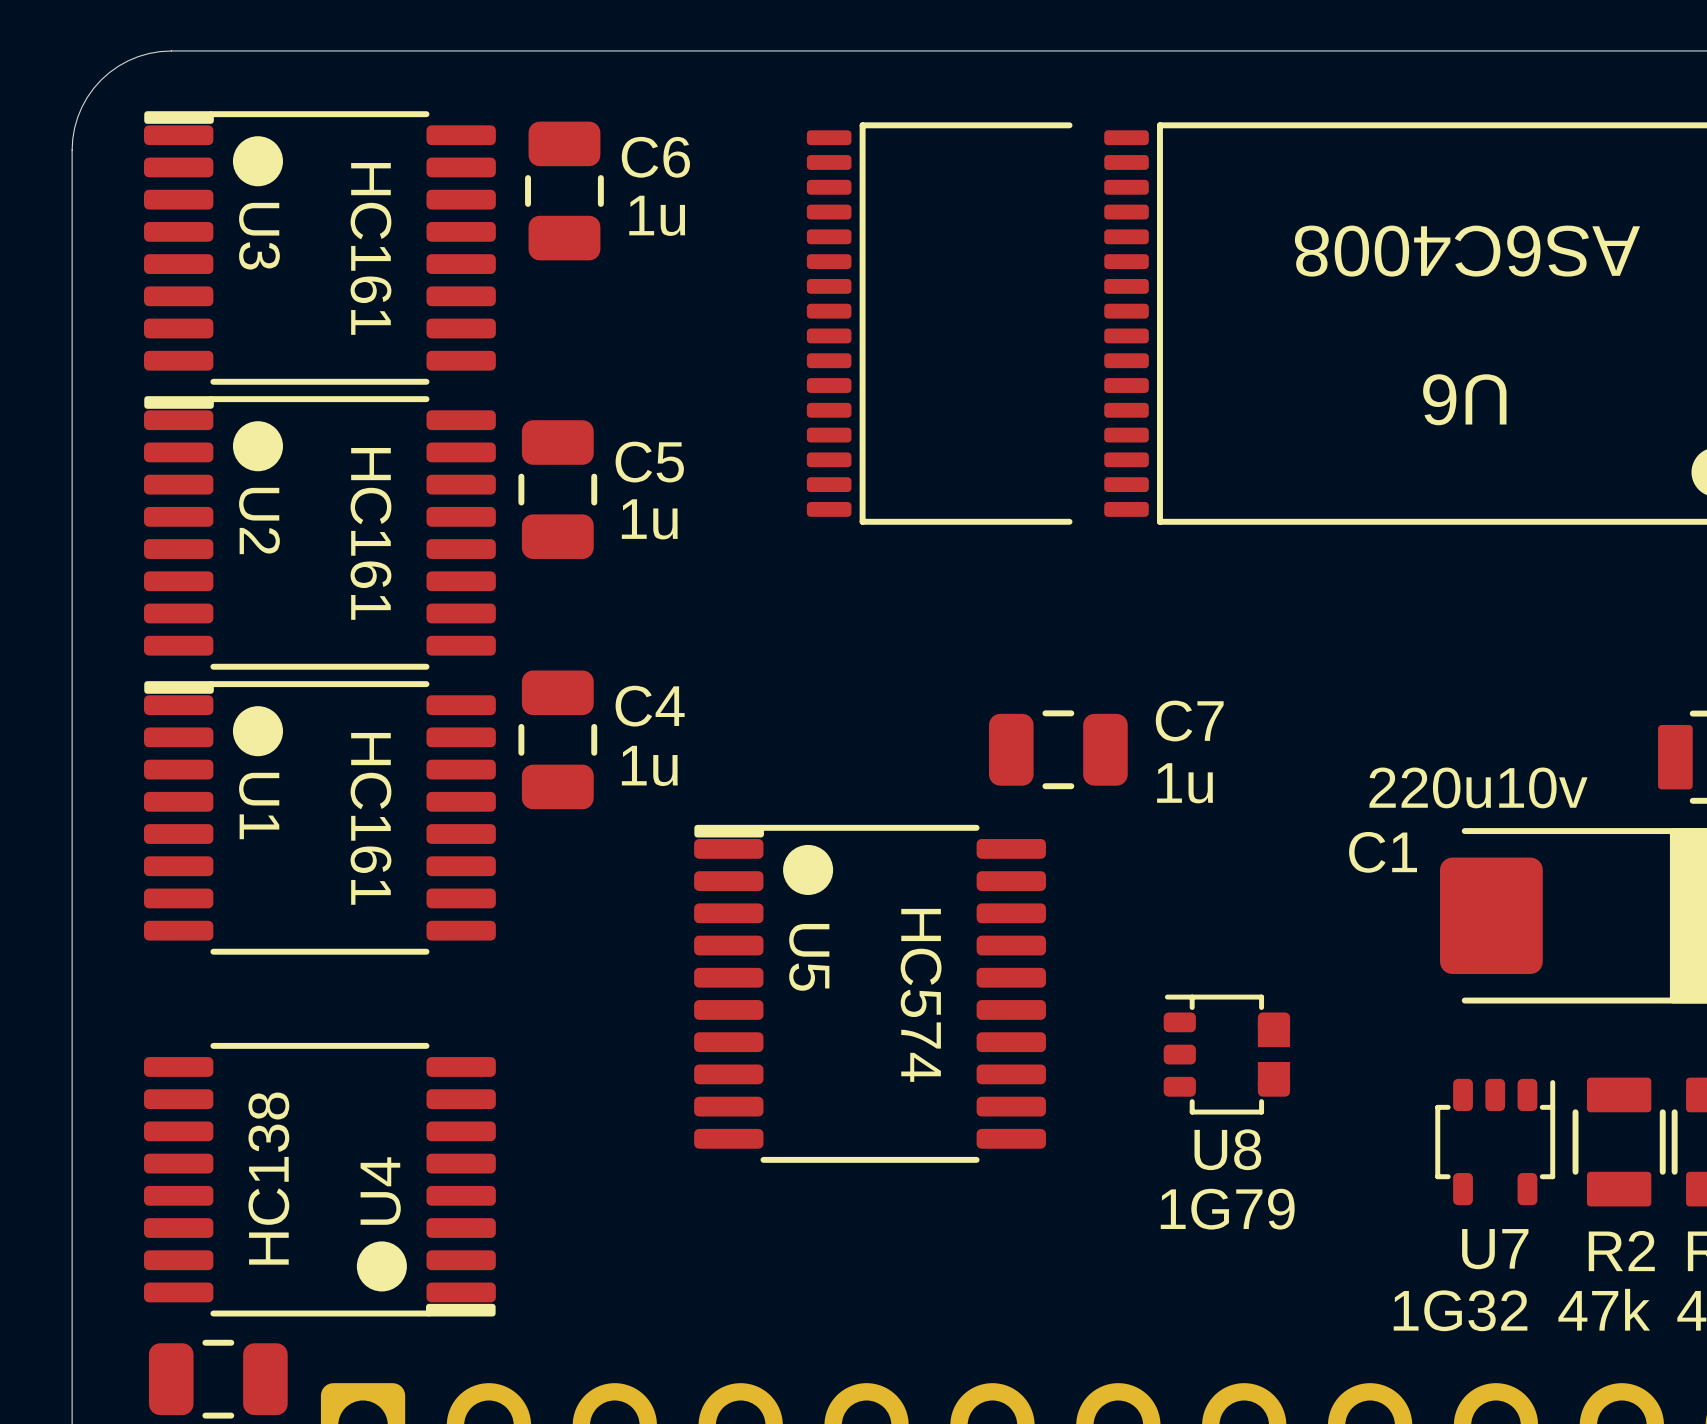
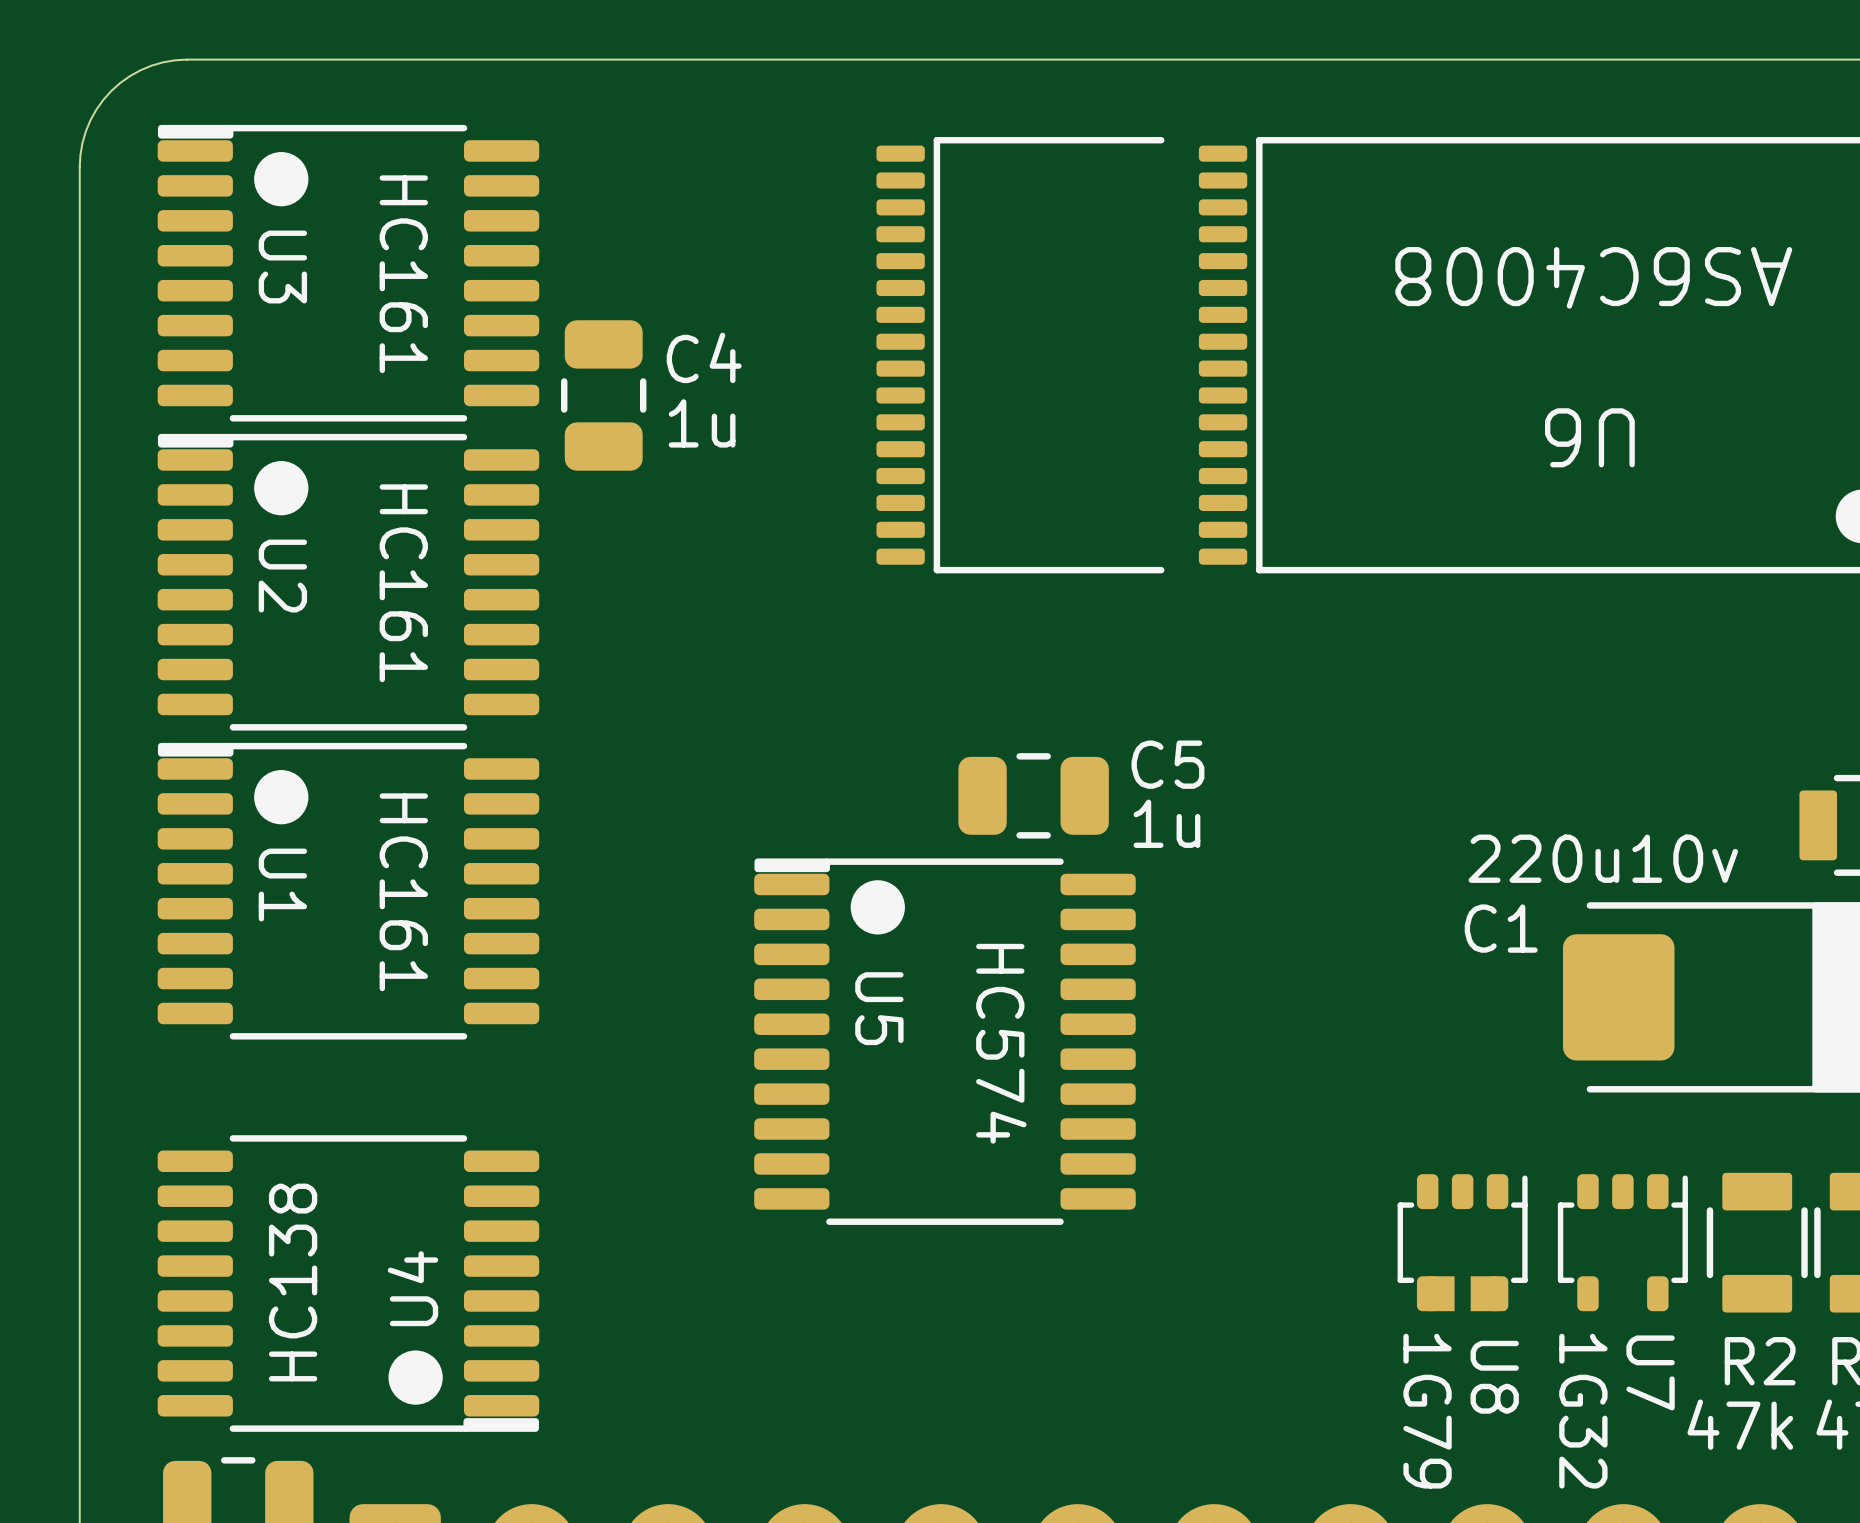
C6: 1u (564, 190) -> none
C5 rotation: 0° (557, 489) -> 90° clockwise (1033, 795)
C5 position: (557, 489) -> (1033, 795)
C4 position: (557, 739) -> (603, 395)
C7: 1u (1058, 749) -> none
U5 position: (870, 993) -> (944, 1041)
U8 rotation: 0° (1226, 1054) -> 90° clockwise (1462, 1242)
U8 position: (1226, 1054) -> (1462, 1242)
part rotation: 0° (1273, 1054) -> 90° clockwise (1462, 1293)
part position: (1273, 1054) -> (1462, 1293)
U7 name rotation: 0° (1495, 1249) -> 90° clockwise (1650, 1372)
U7 value rotation: 0° (1460, 1310) -> 90° clockwise (1583, 1411)

